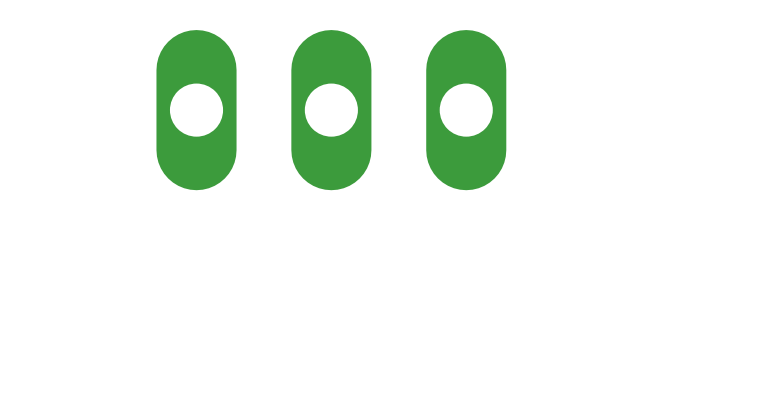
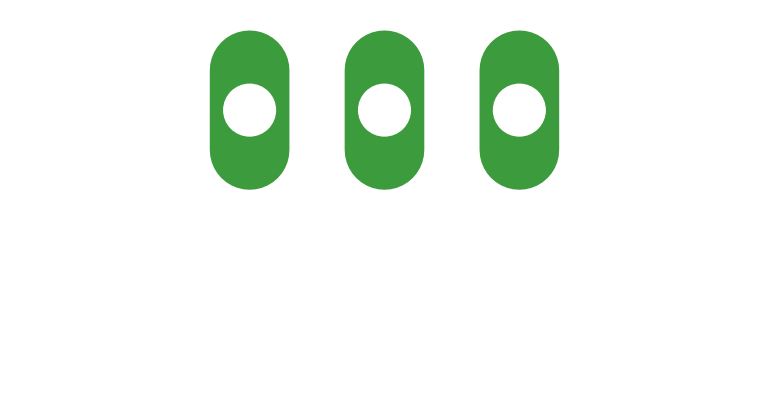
part footprint: [156, 30, 507, 191] -> [209, 30, 560, 190]

